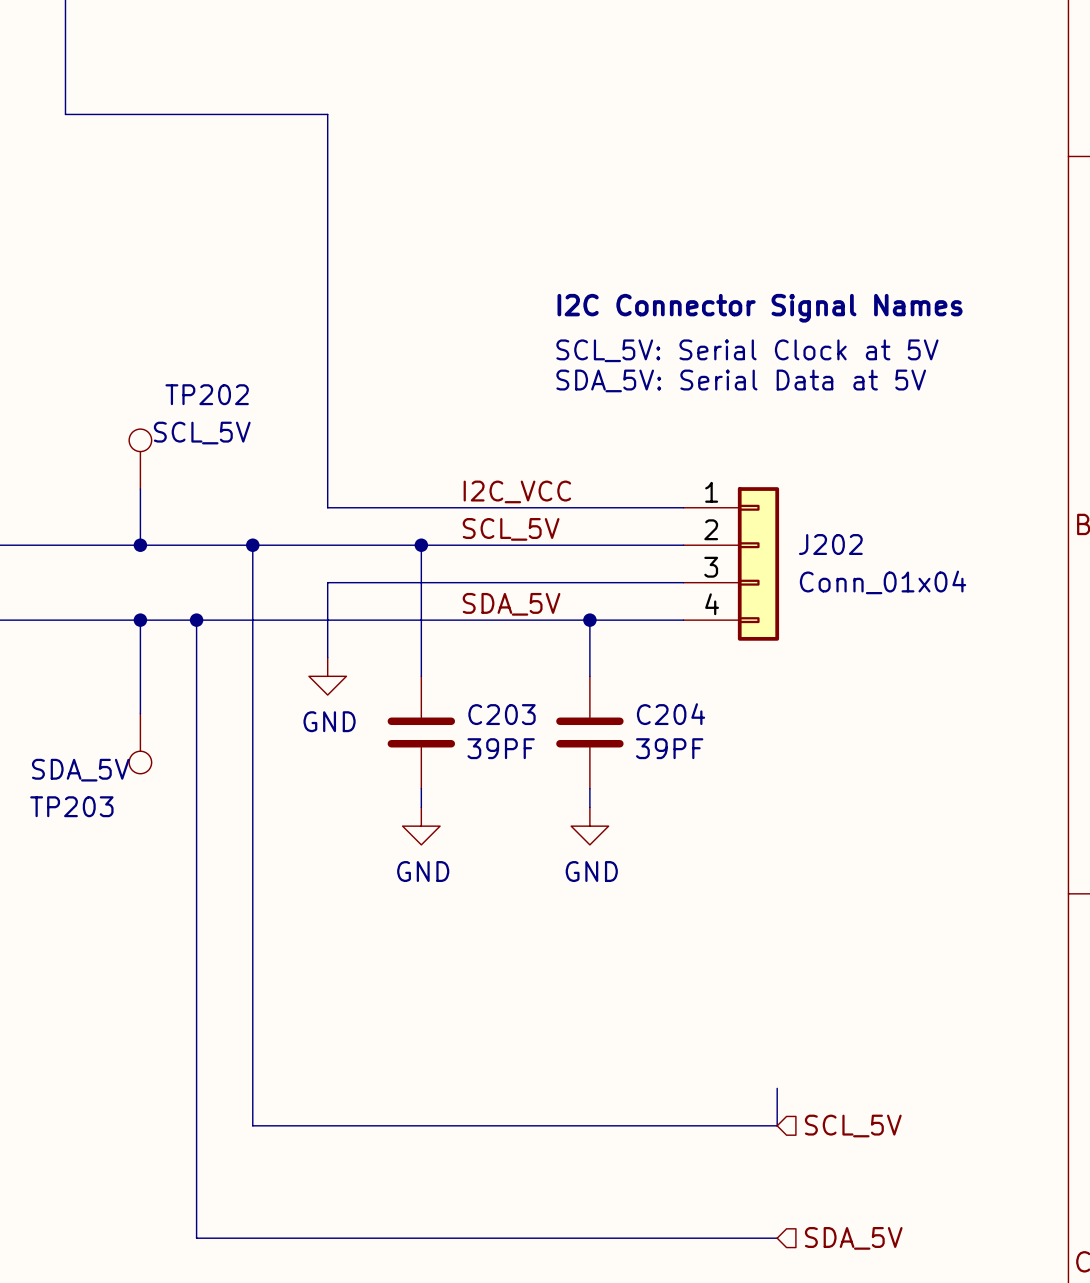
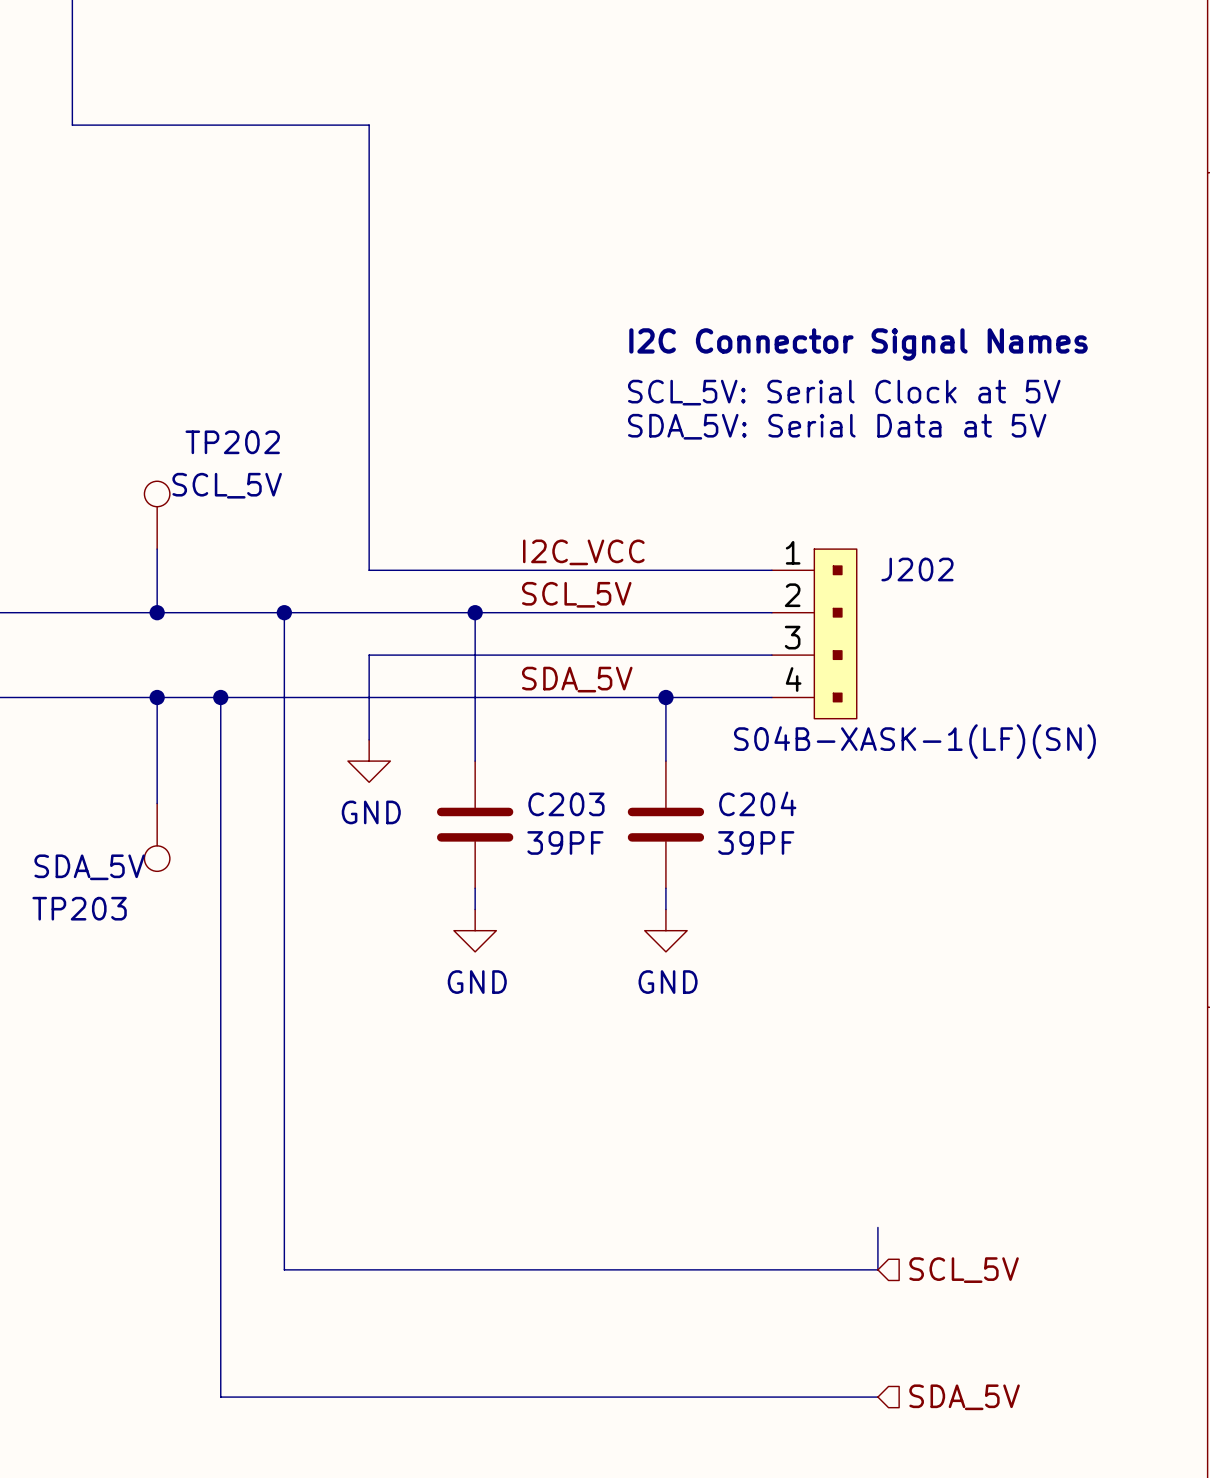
J202 symbol: [683, 487, 780, 641] -> [771, 549, 857, 719]
J202 name position: J202 (830, 544) -> J202 (917, 569)
J202 value: Conn_01x04 (883, 582) -> S04B-XASK-1(LF)(SN) (914, 741)

